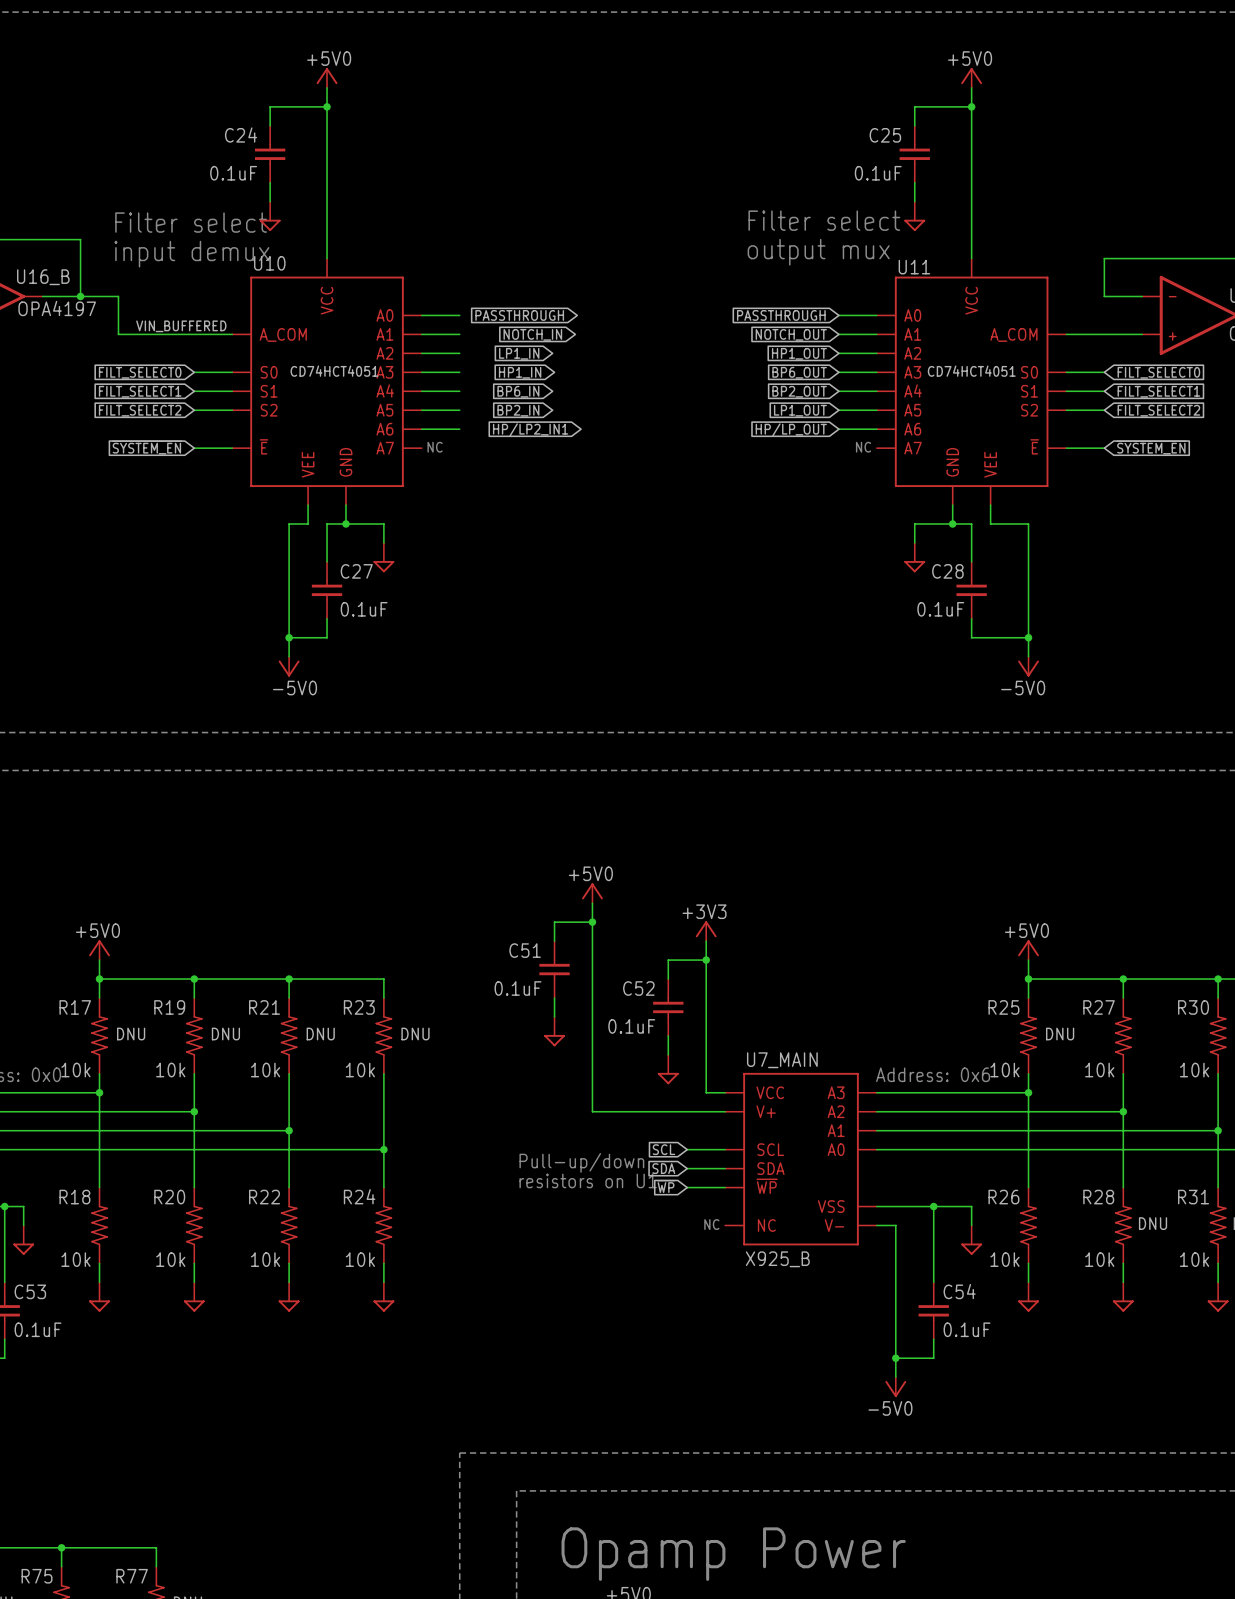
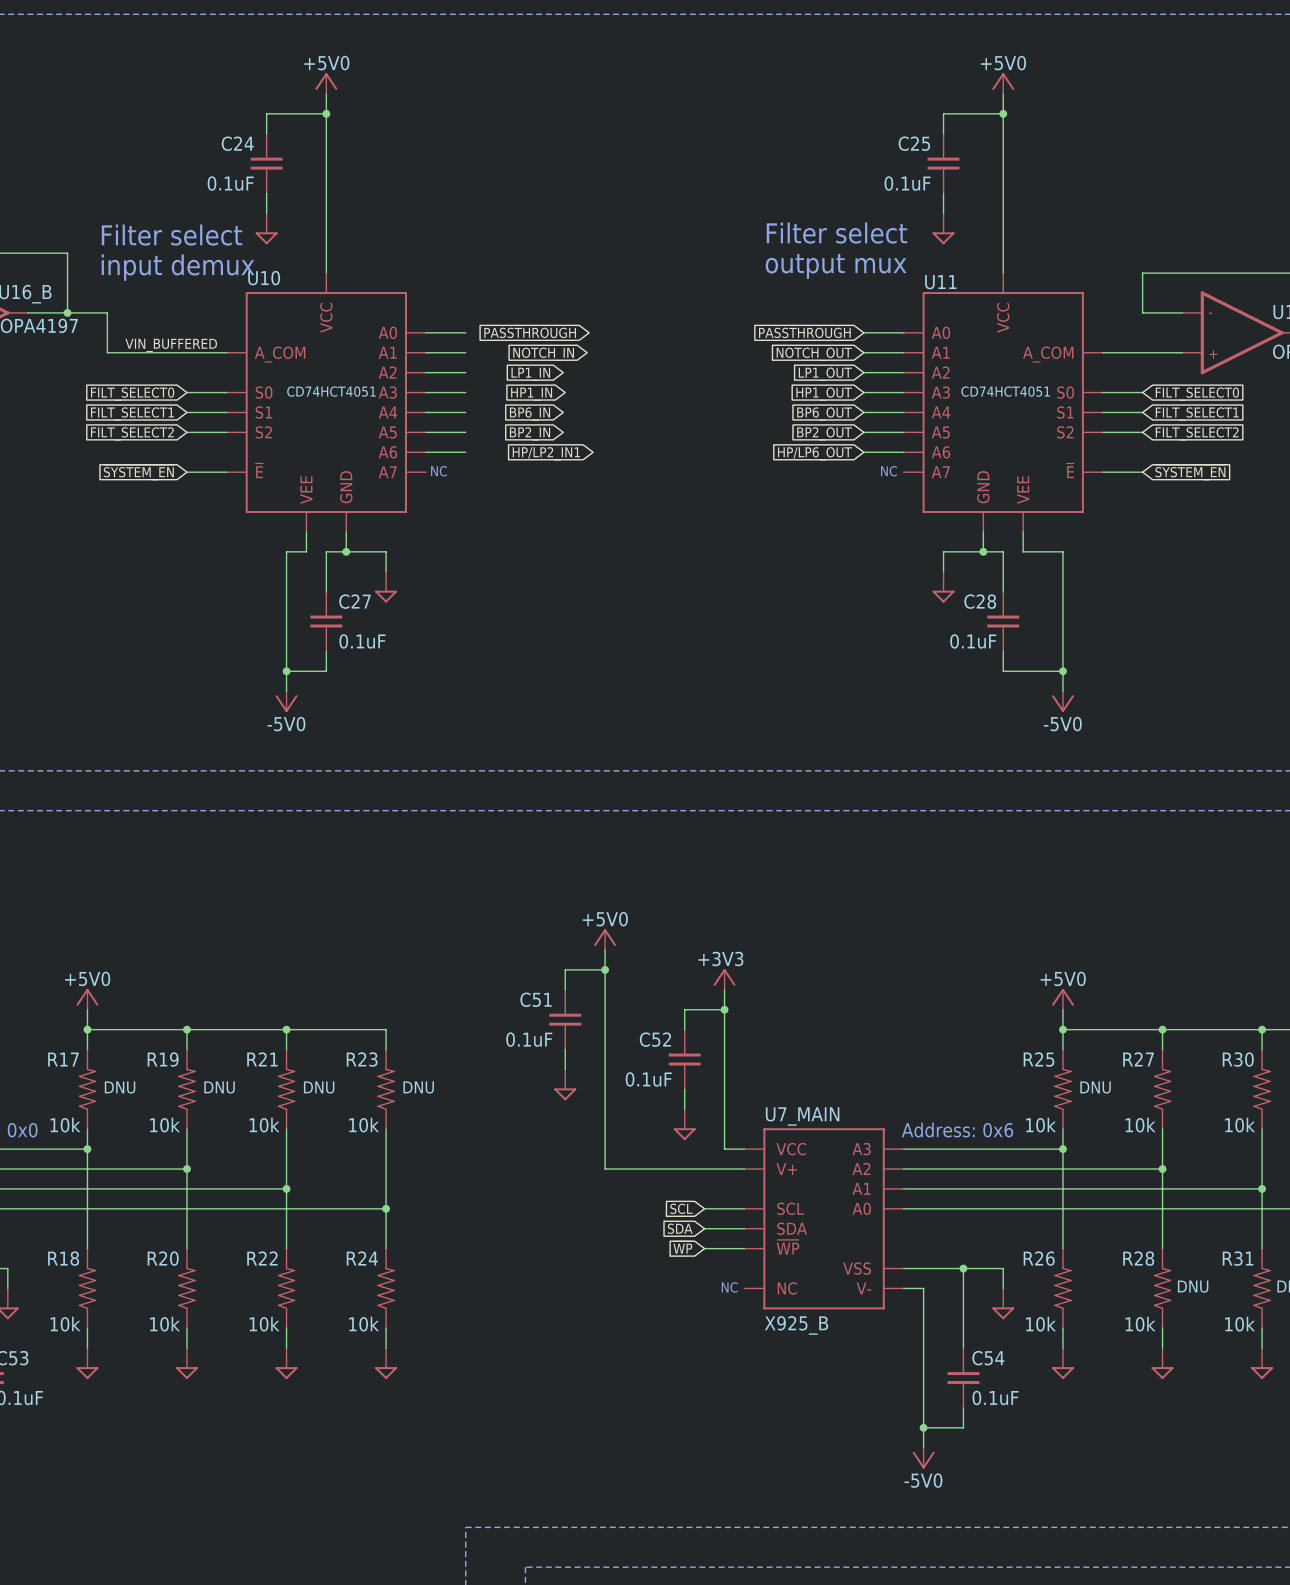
global label: HP1_OUT (799, 353) -> LP1_OUT (825, 374)
global label: BP6_OUT (799, 372) -> HP1_OUT (824, 394)
global label: BP2_OUT (799, 391) -> BP6_OUT (824, 414)
global label: LP1_OUT (800, 410) -> BP2_OUT (824, 433)
global label: HP/LP_OUT (791, 430) -> HP/LP6_OUT (814, 453)
text: Pull-up/down (581, 1162) -> none
text: resistors on U1 (588, 1180) -> none

